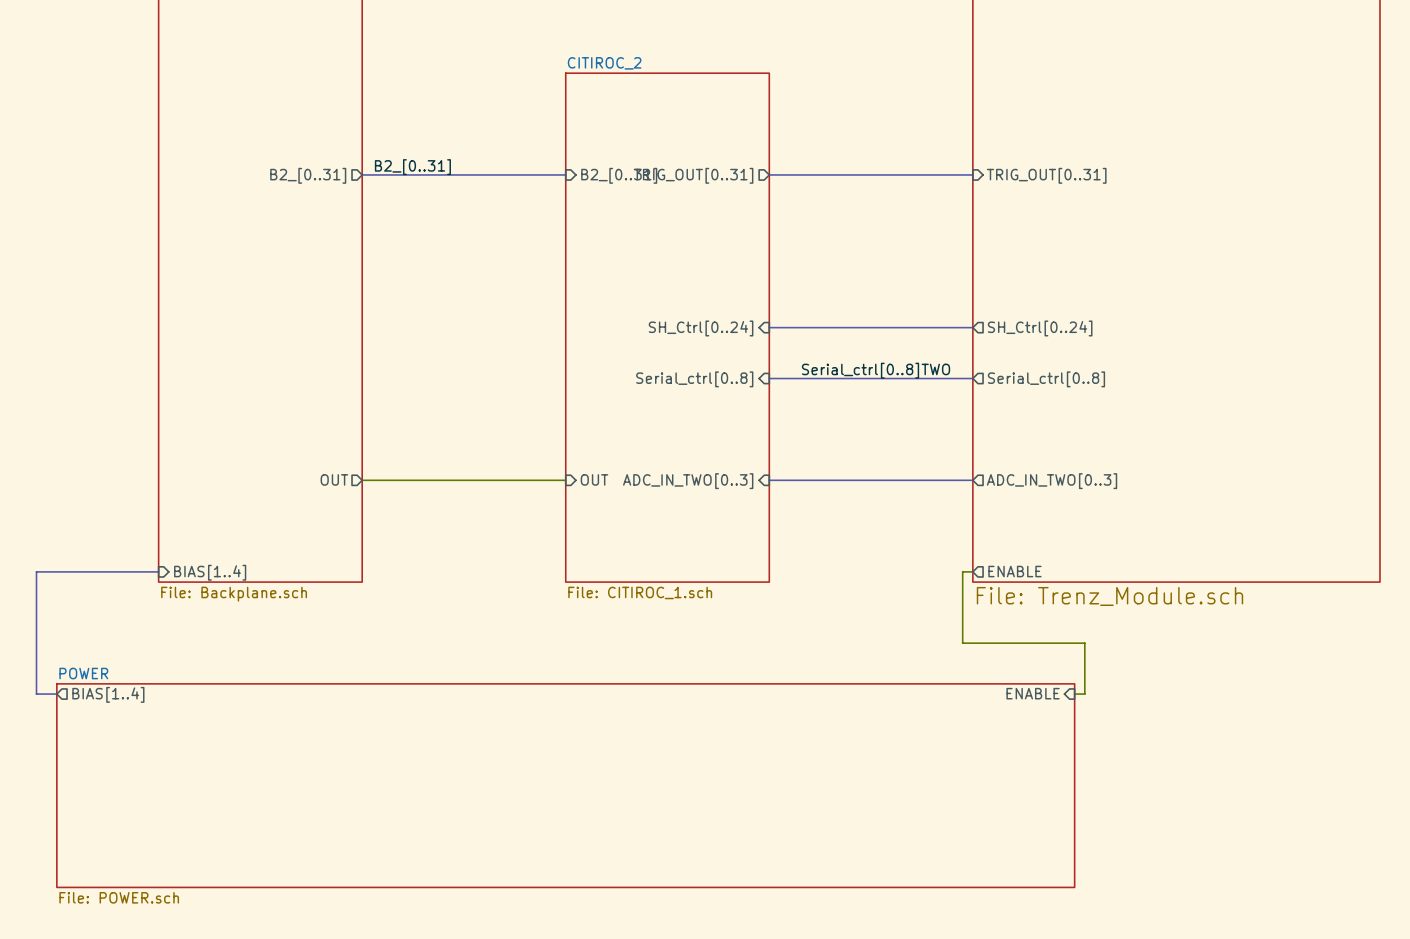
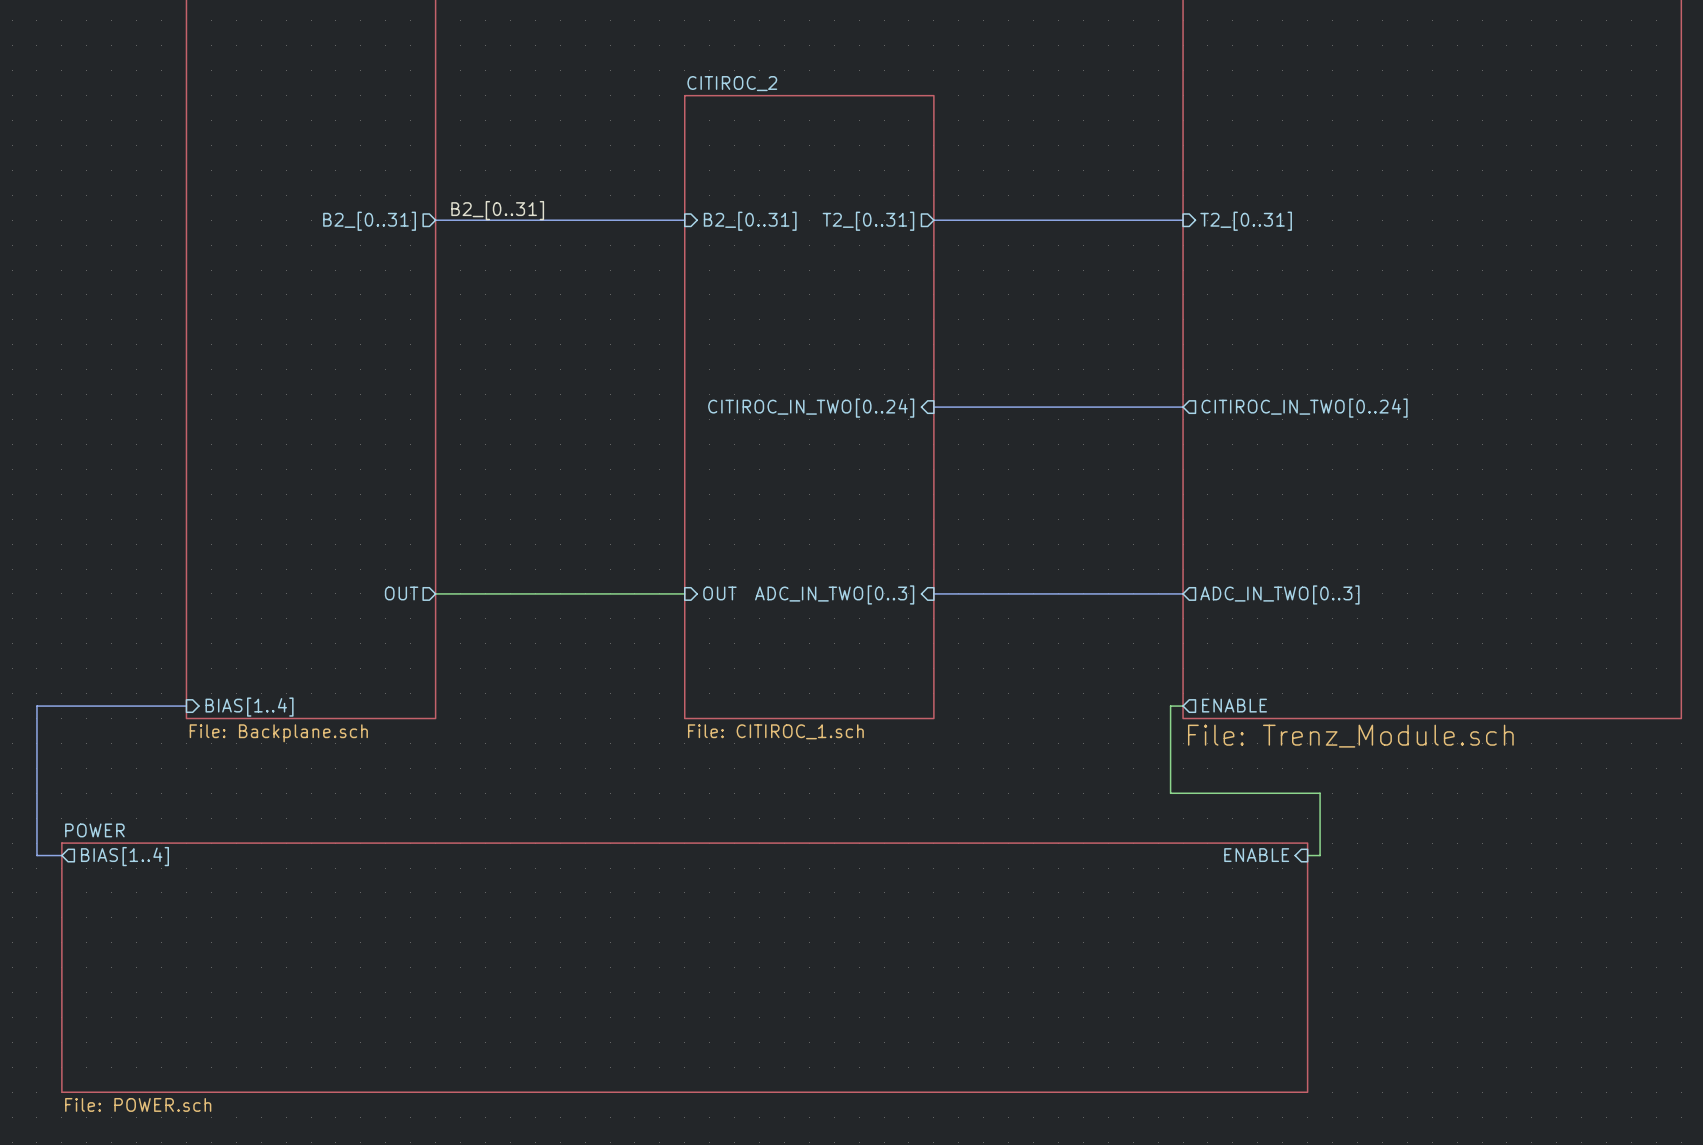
sheet pin: TRIG_OUT[0..31] (693, 175) -> T2_[0..31] (868, 221)
sheet pin: TRIG_OUT[0..31] (1046, 175) -> T2_[0..31] (1246, 221)
sheet pin: SH_Ctrl[0..24] (701, 328) -> CITIROC_IN_TWO[0..24] (811, 408)
sheet pin: SH_Ctrl[0..24] (1040, 328) -> CITIROC_IN_TWO[0..24] (1304, 408)
label: Serial_ctrl[0..8]TWO (876, 370) -> none
bus: (769, 378) (972, 378) -> none
sheet pin: Serial_ctrl[0..8] (694, 379) -> none
sheet pin: Serial_ctrl[0..8] (1046, 379) -> none

